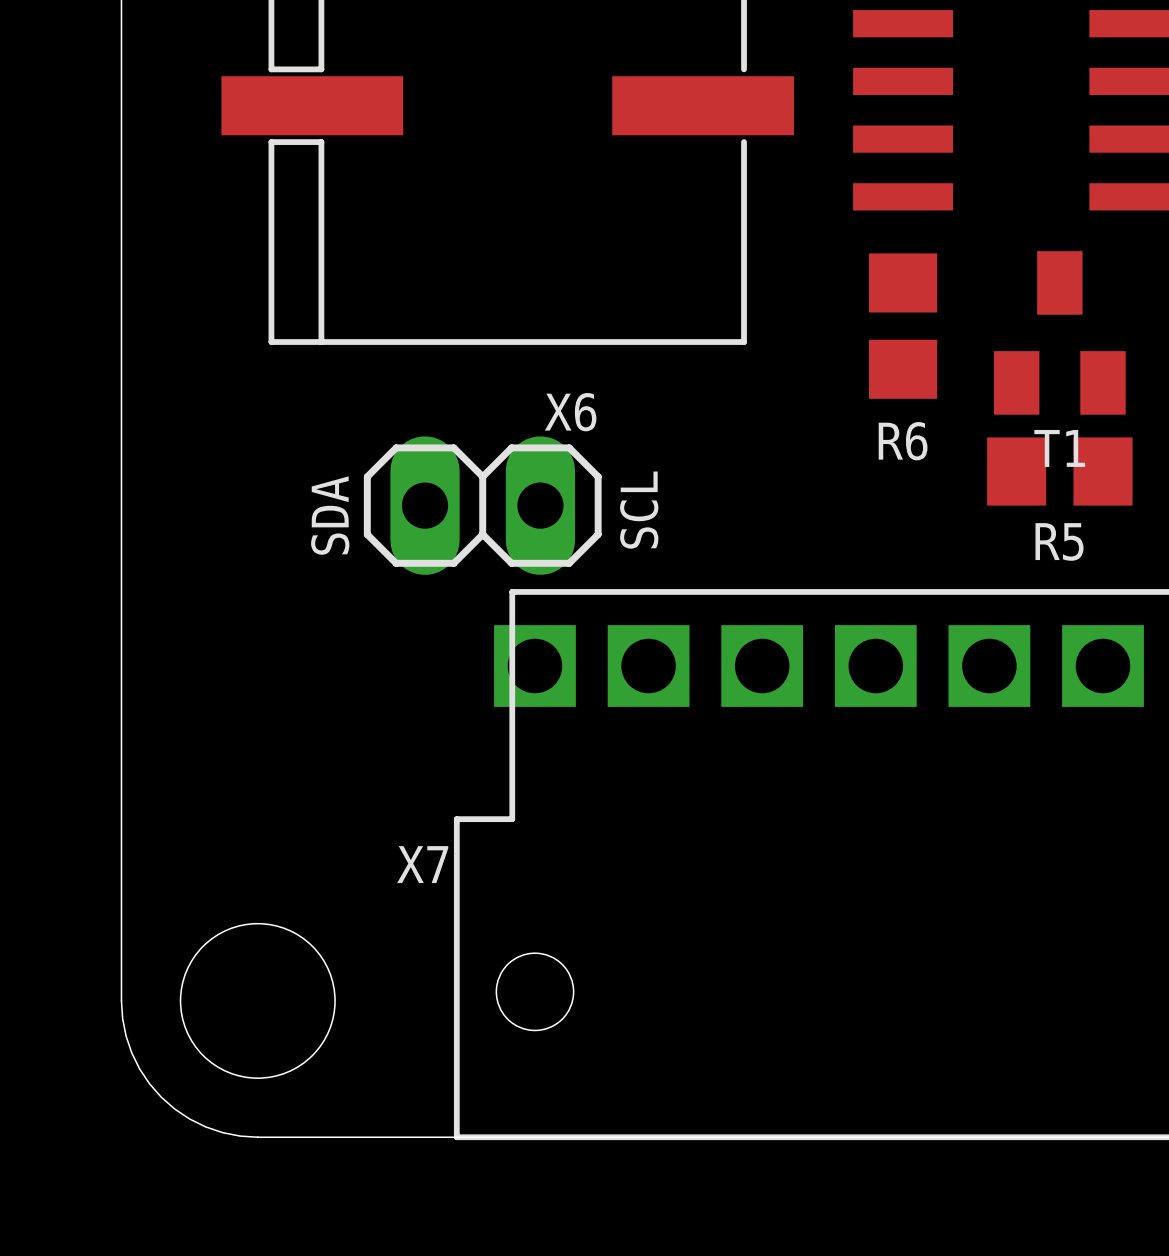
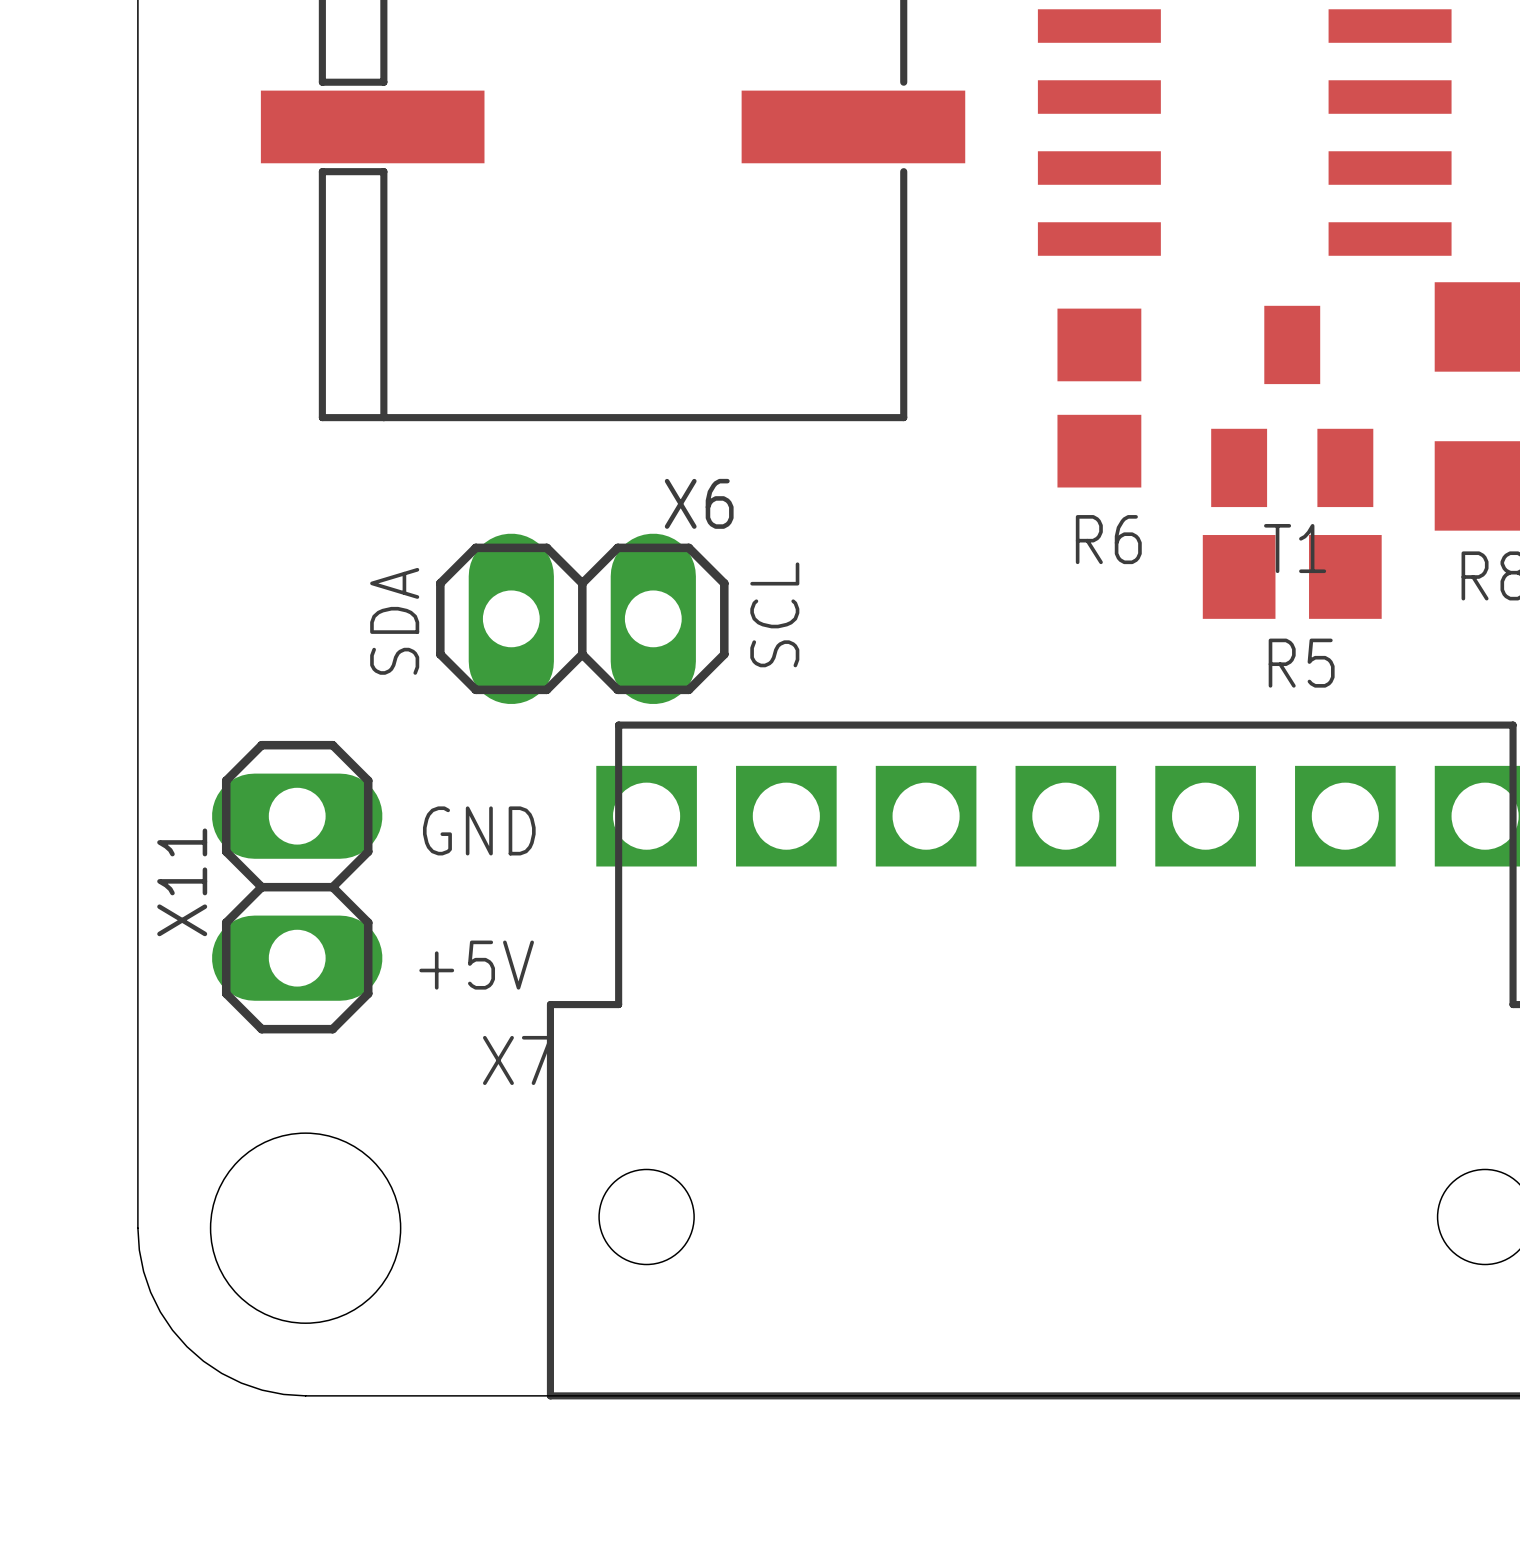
text: none -> GND (479, 830)
X11: none -> (297, 887)
text: none -> +5V (476, 965)

